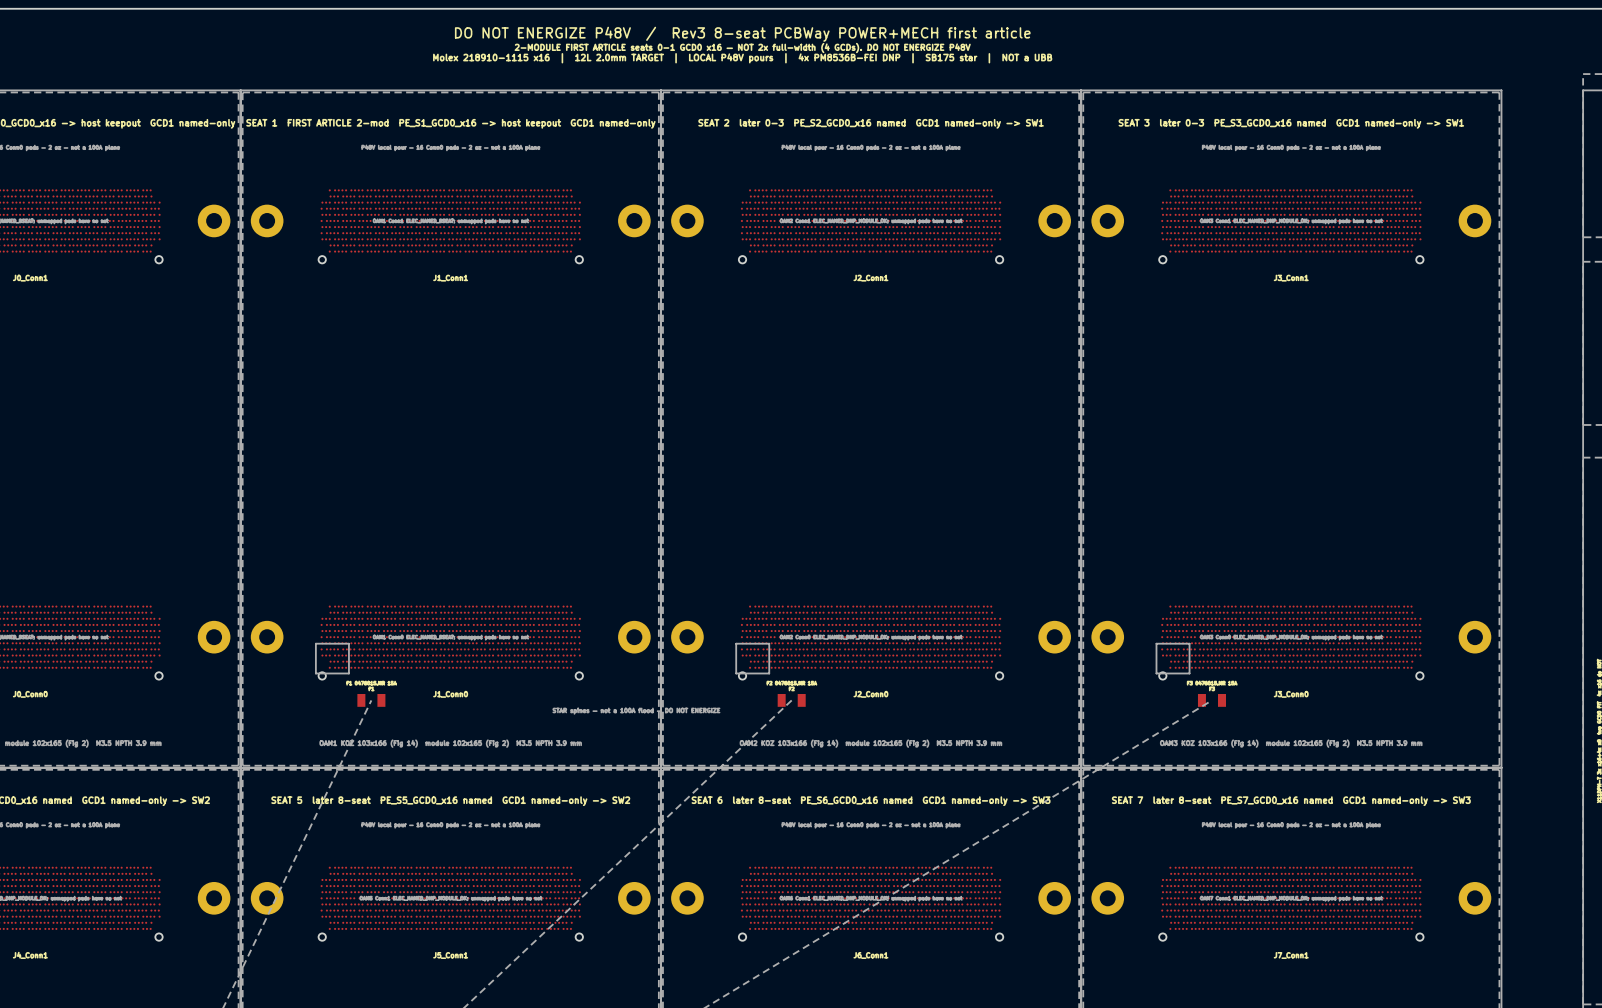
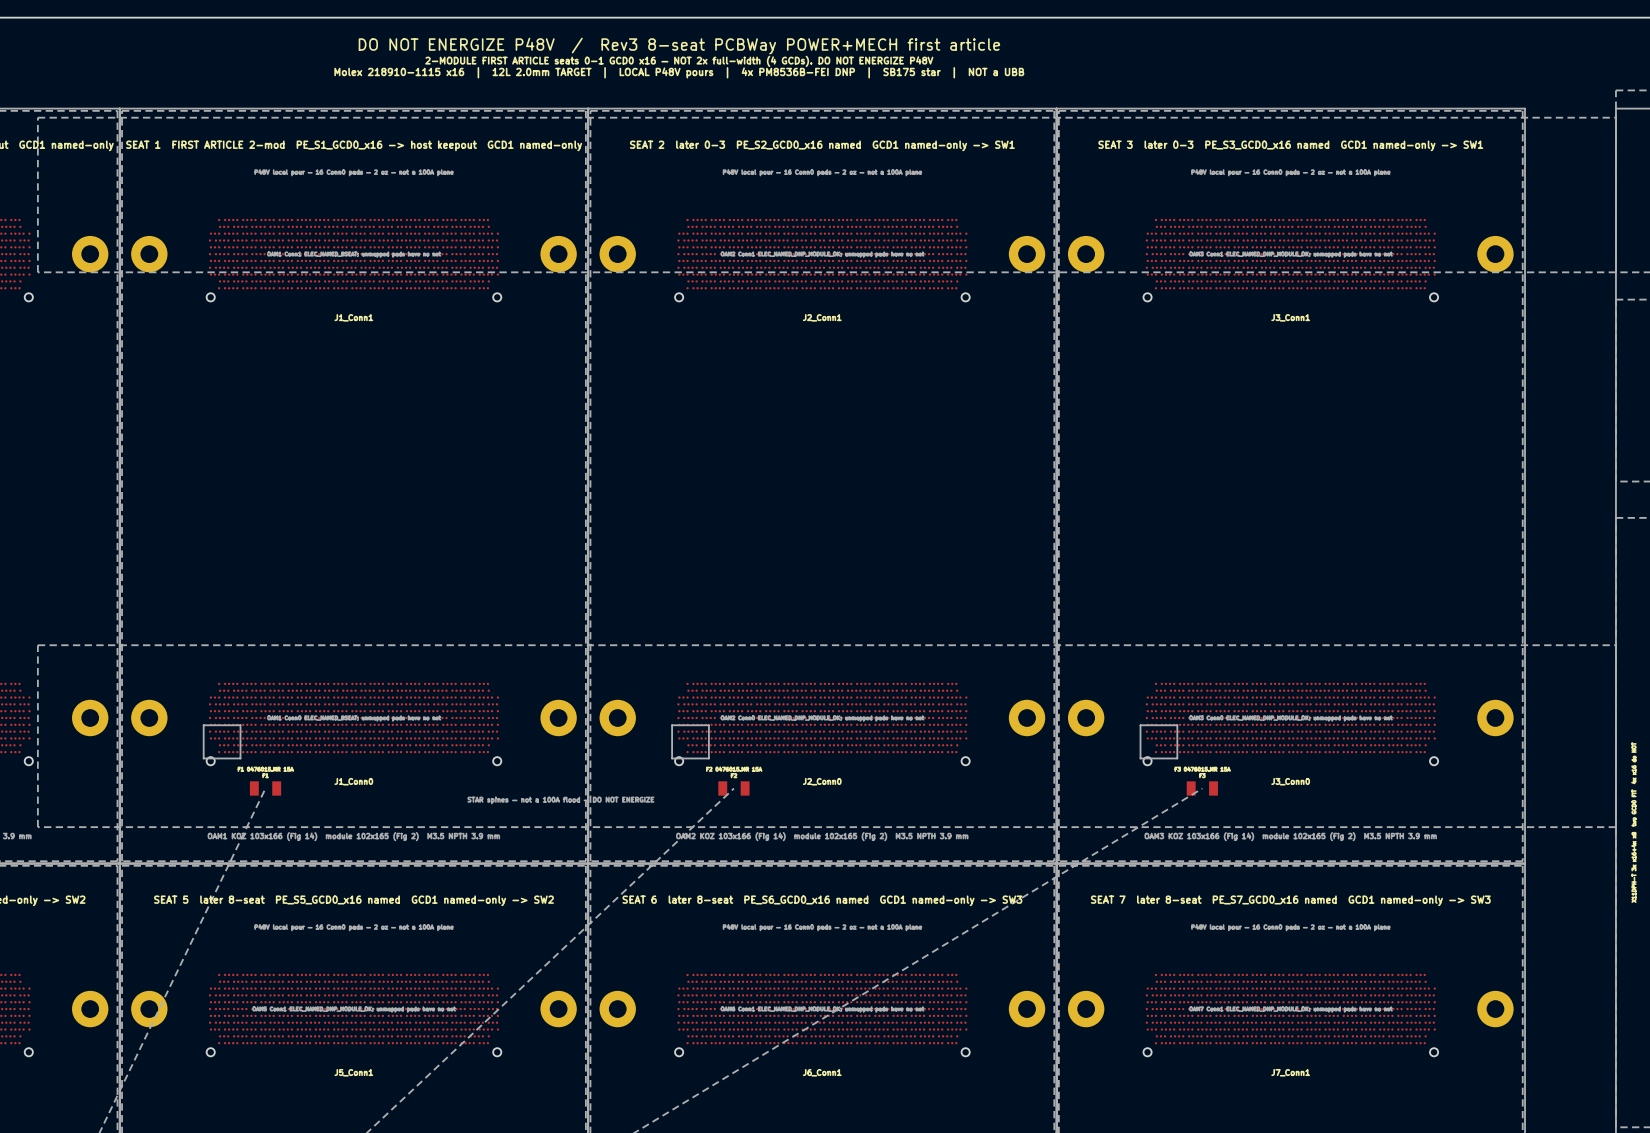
line: none -> (37, 117) (37, 272) (1615, 272) (1615, 117) (37, 117)
line: none -> (37, 645) (1615, 645) (1615, 827) (37, 827) (37, 645)

